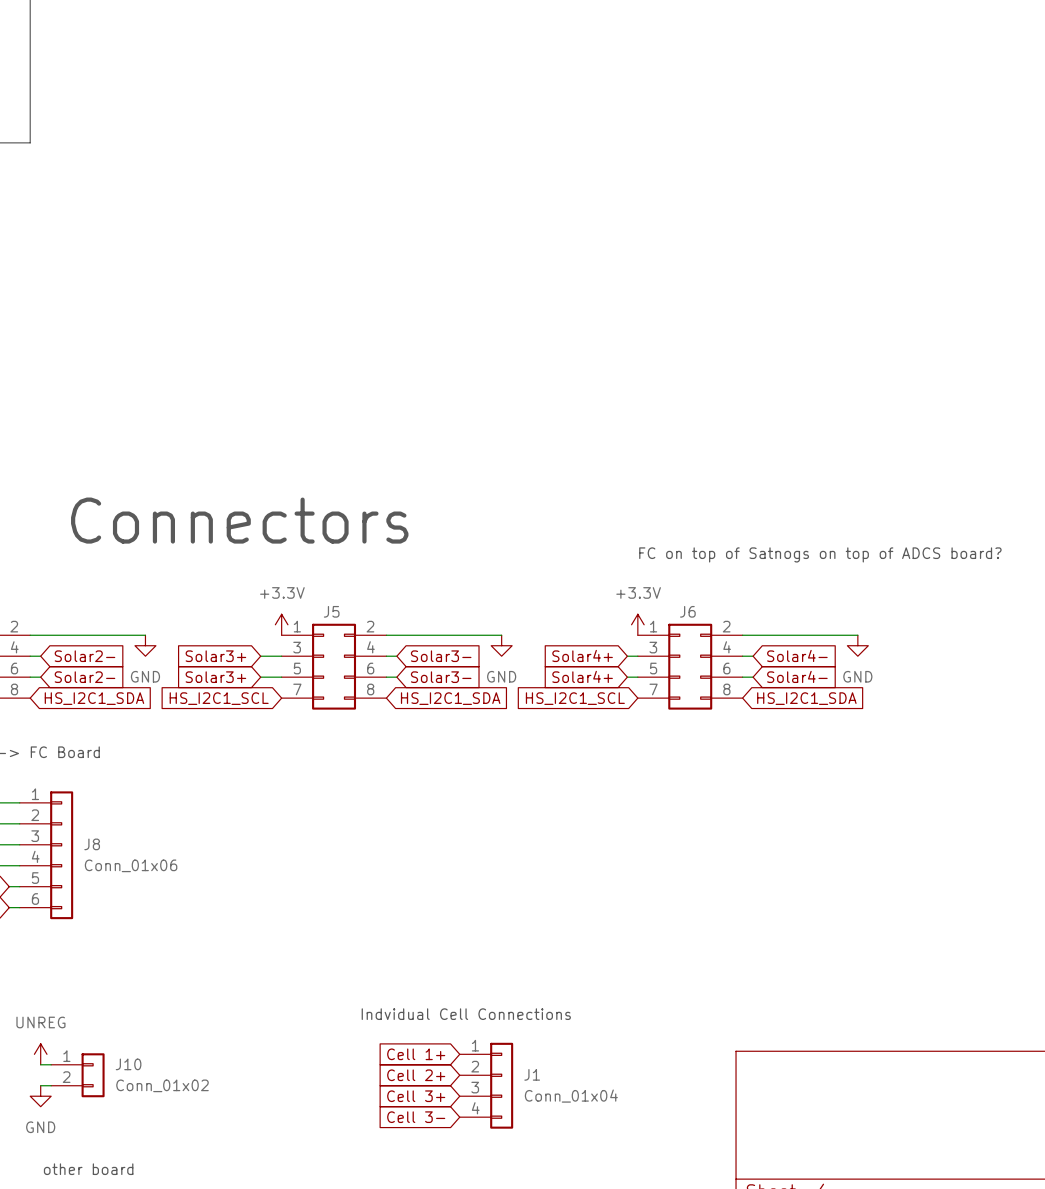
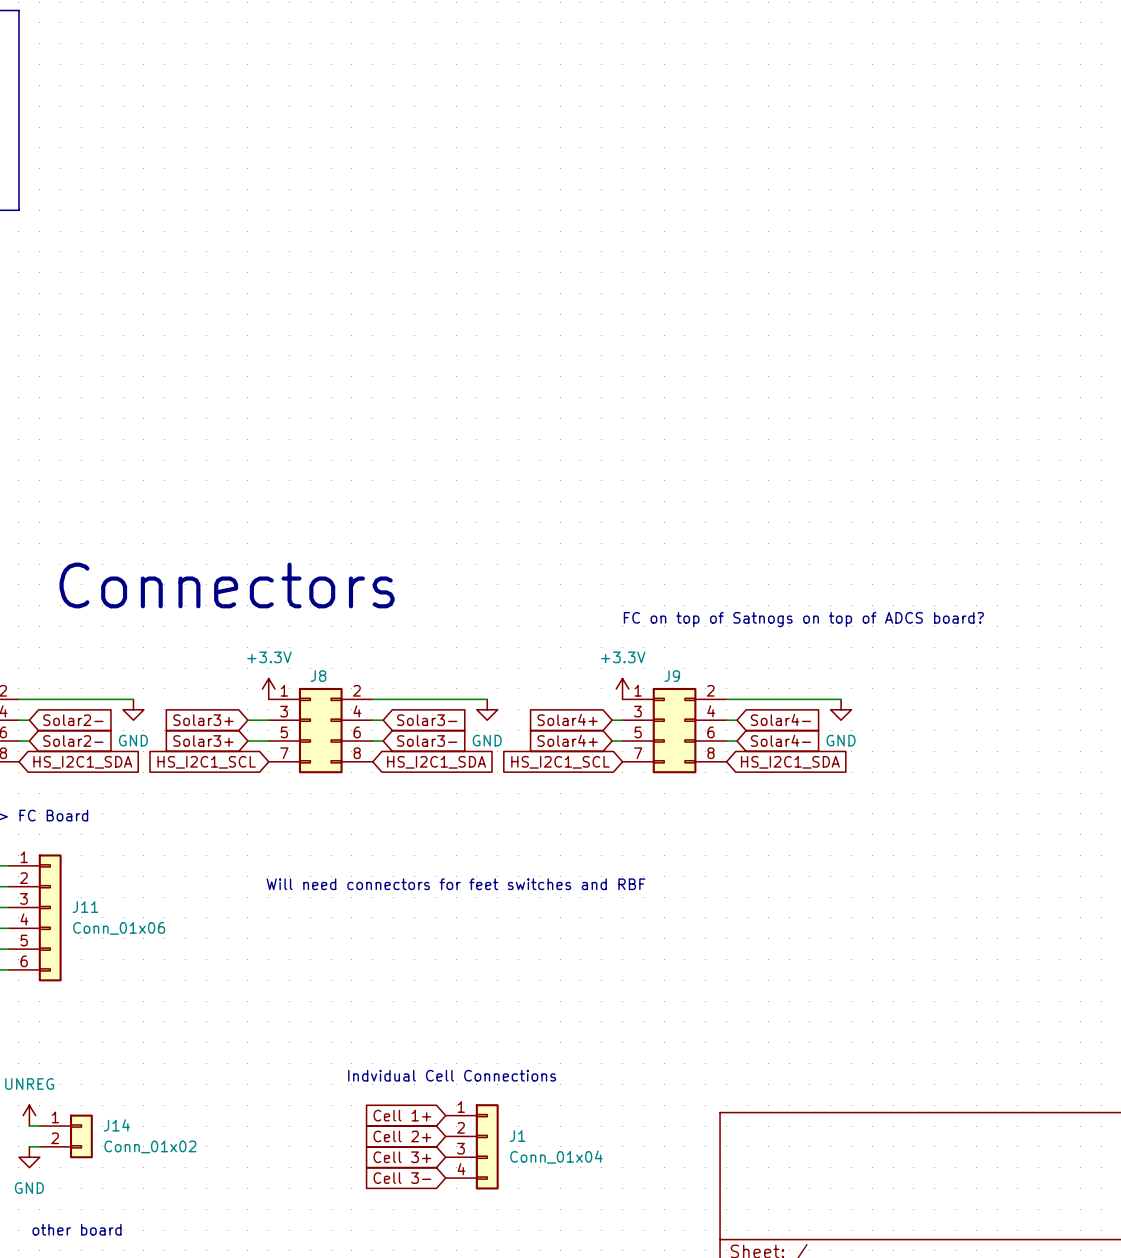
J5 name: J5 (331, 611) -> J8 (318, 676)
J6 name: J6 (687, 611) -> J9 (672, 676)
text: none -> Will need connectors for feet switches and RBF (456, 884)
J8 name: J8 (92, 844) -> J11 (85, 907)
J10 name: J10 (128, 1064) -> J14 (116, 1125)

